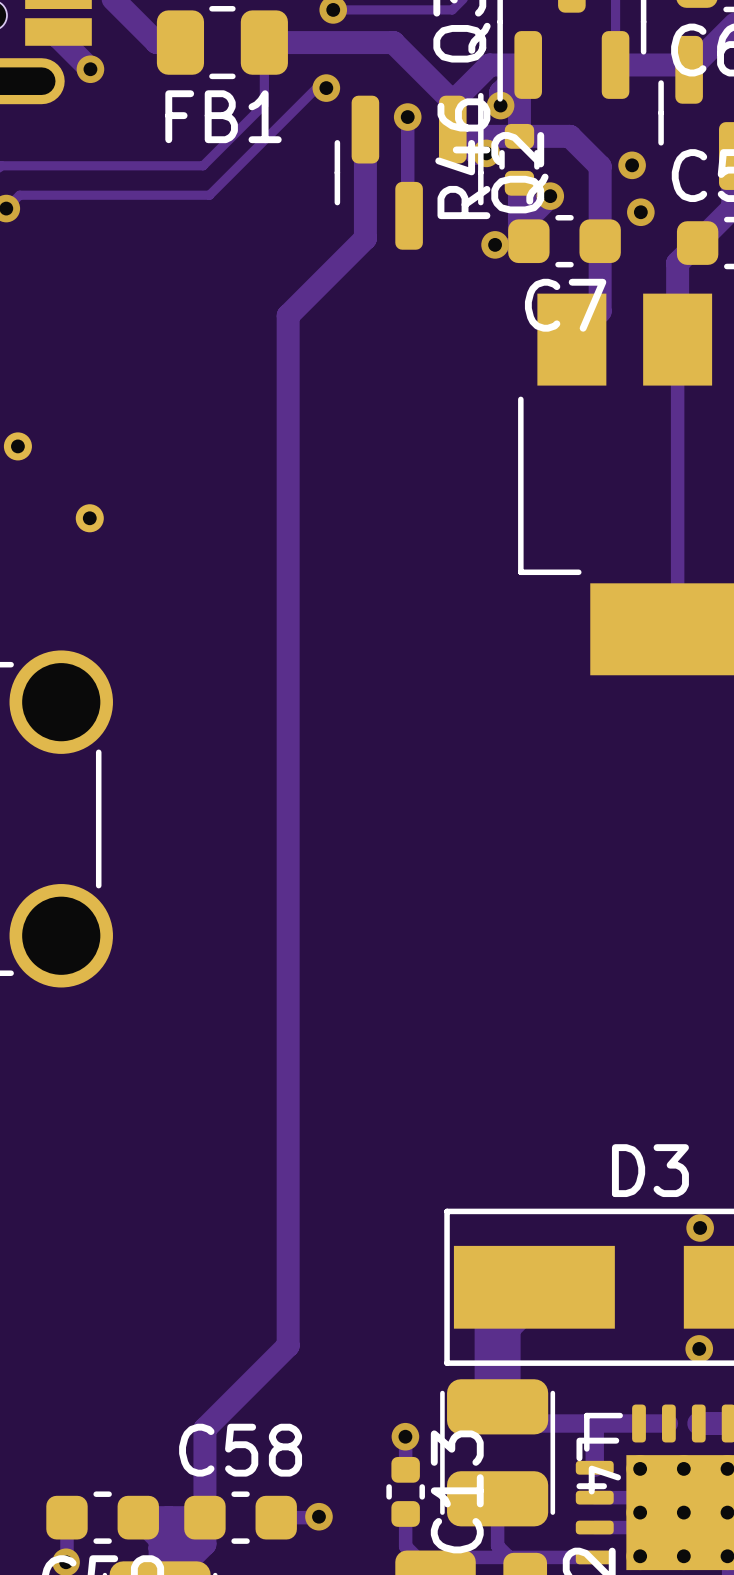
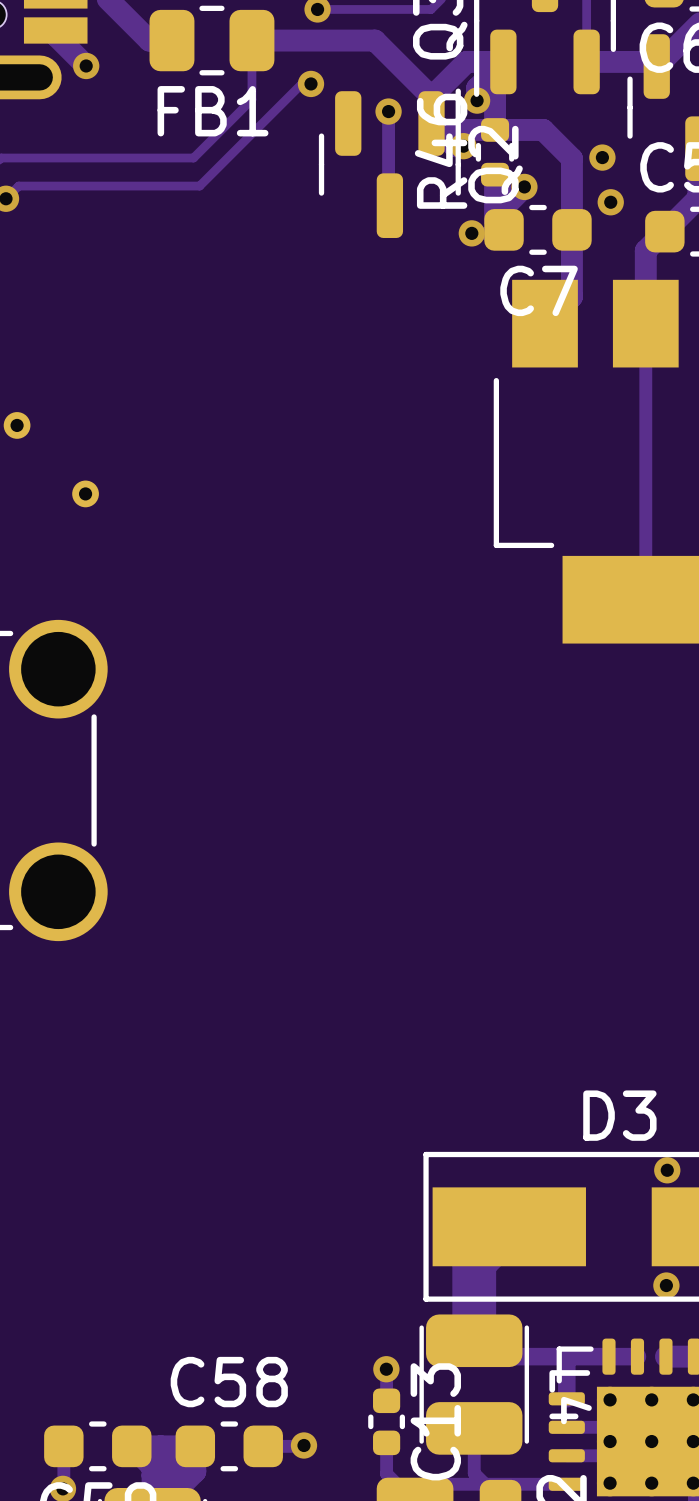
track: (365, 129) (365, 238) (288, 315) (288, 1345) (204, 1428) (204, 1517) -> none

